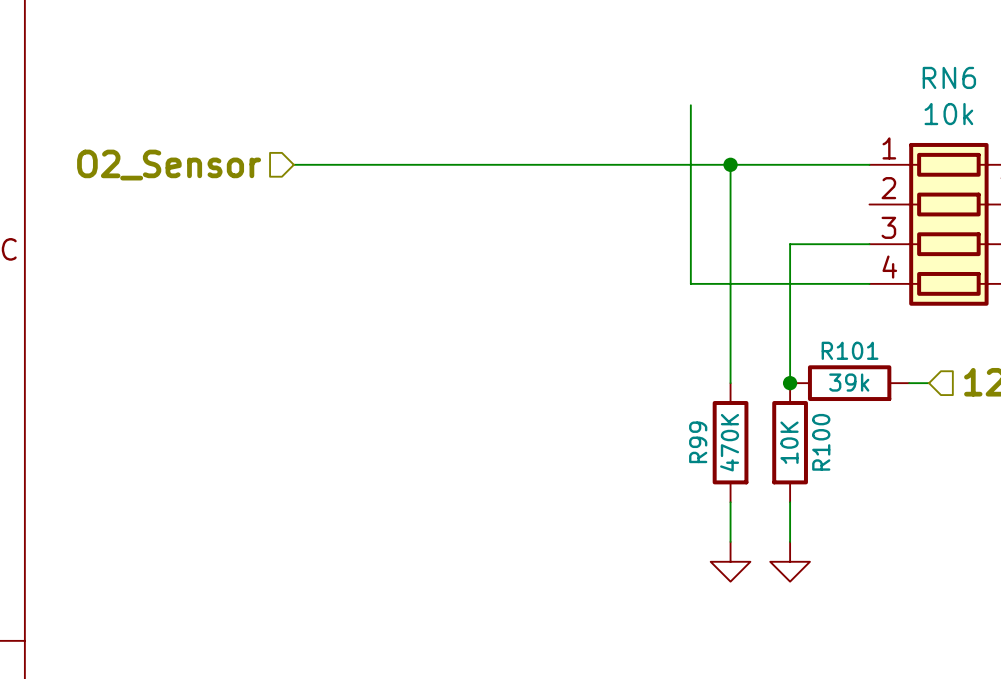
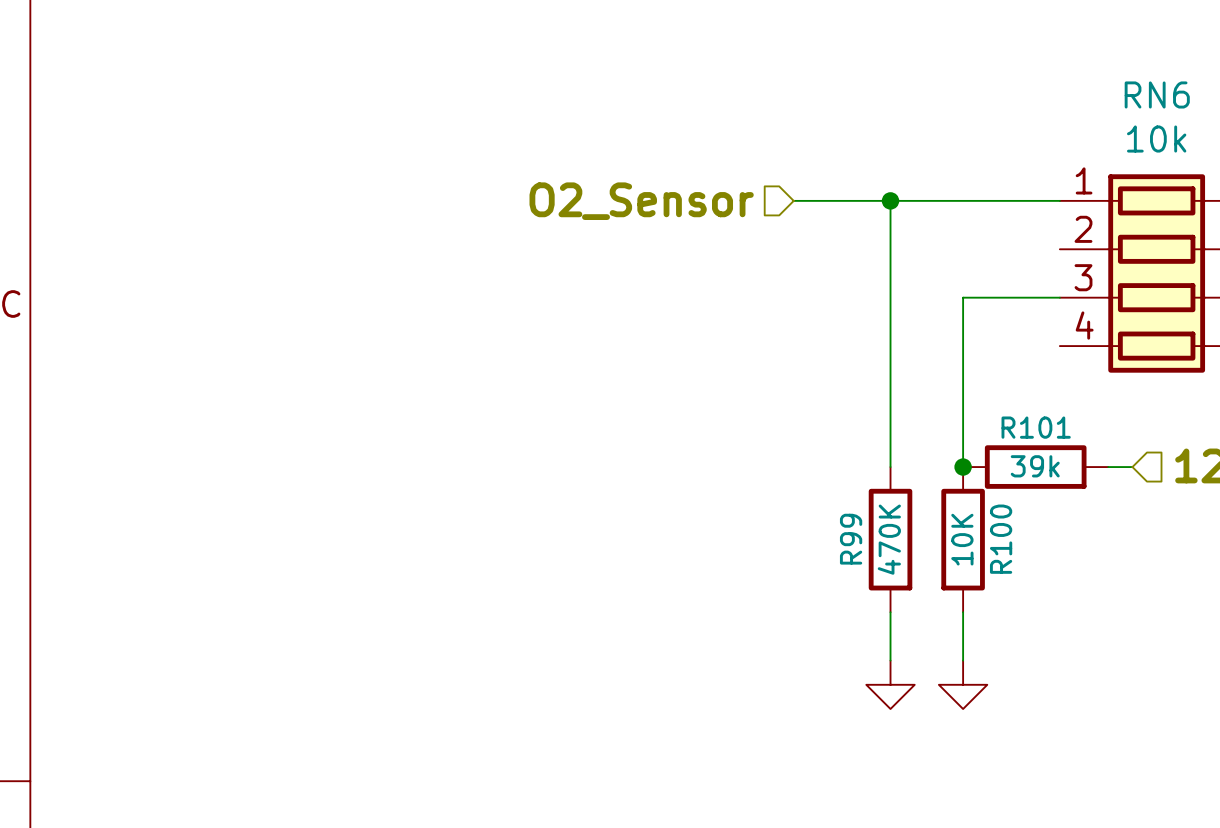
wire: (690, 105) (690, 283) (869, 283) -> none
wire: (293, 164) (651, 164) -> none
hierarchical label position: O2_Sensor (169, 165) -> O2_Sensor (641, 201)

